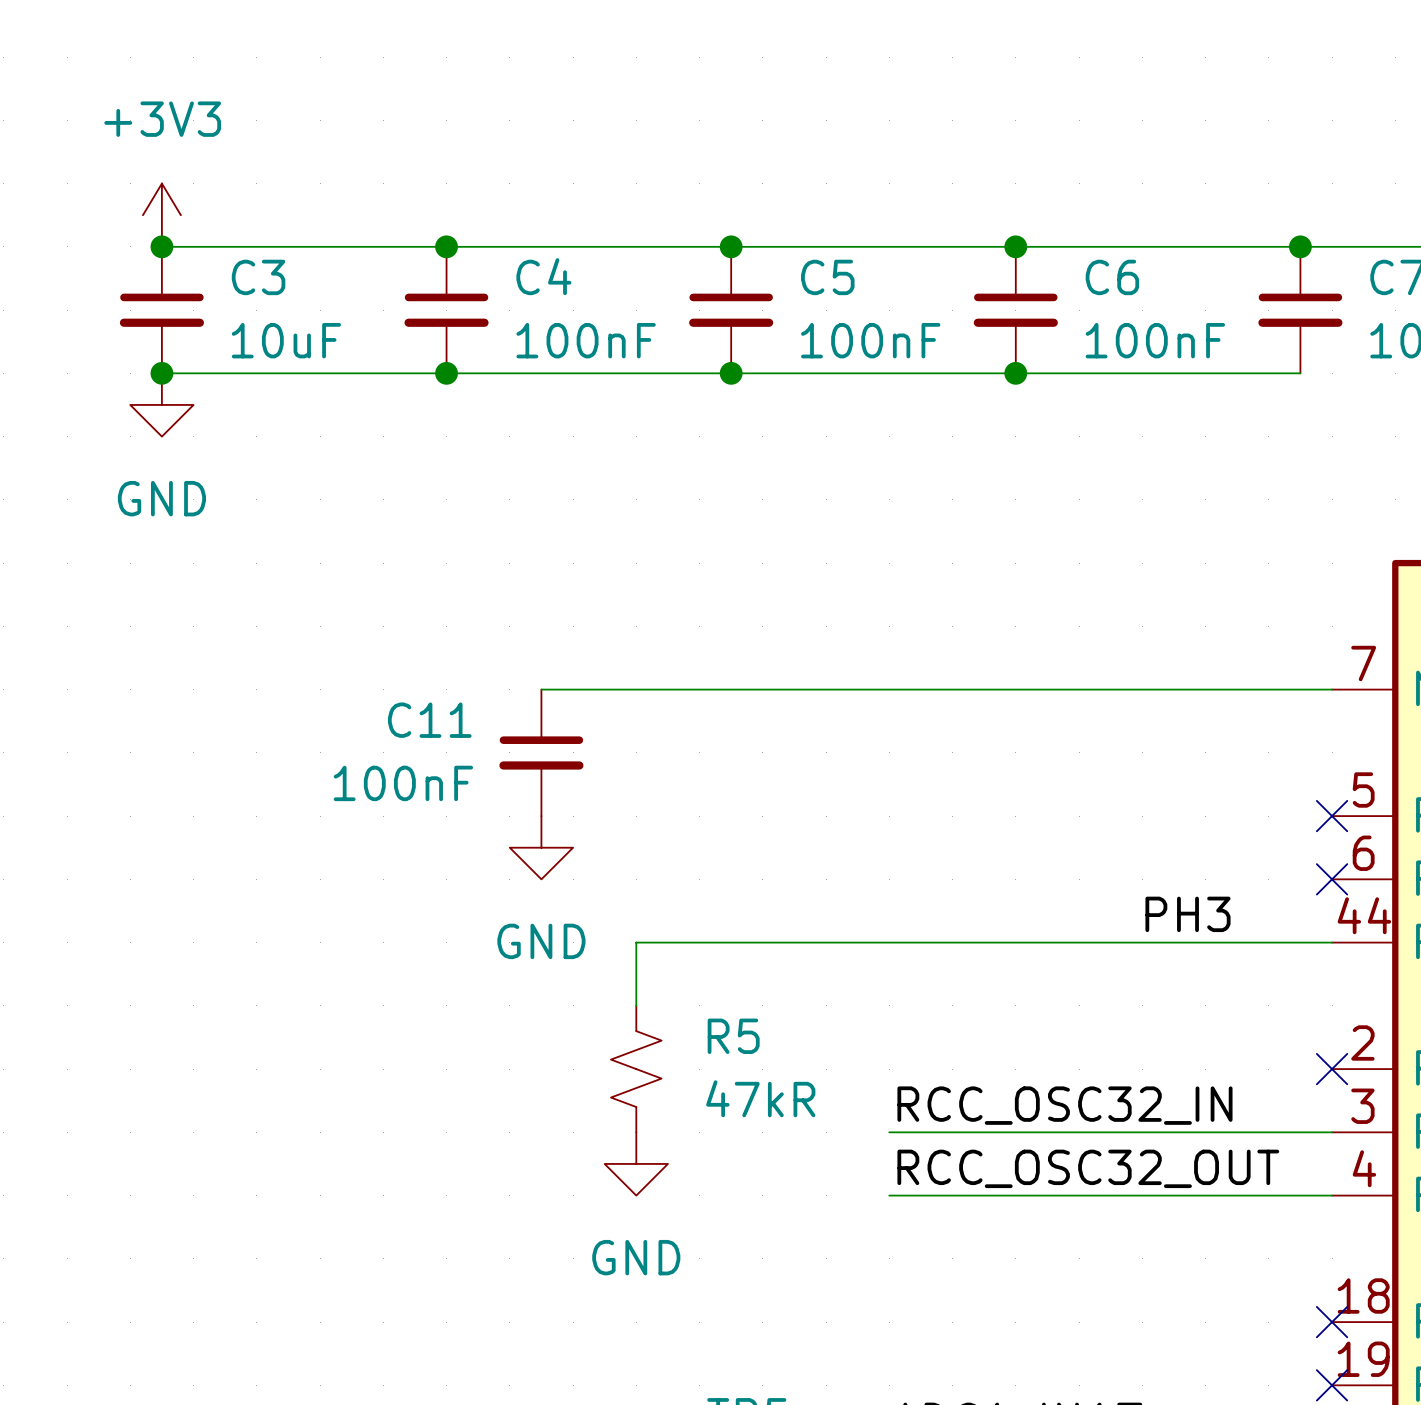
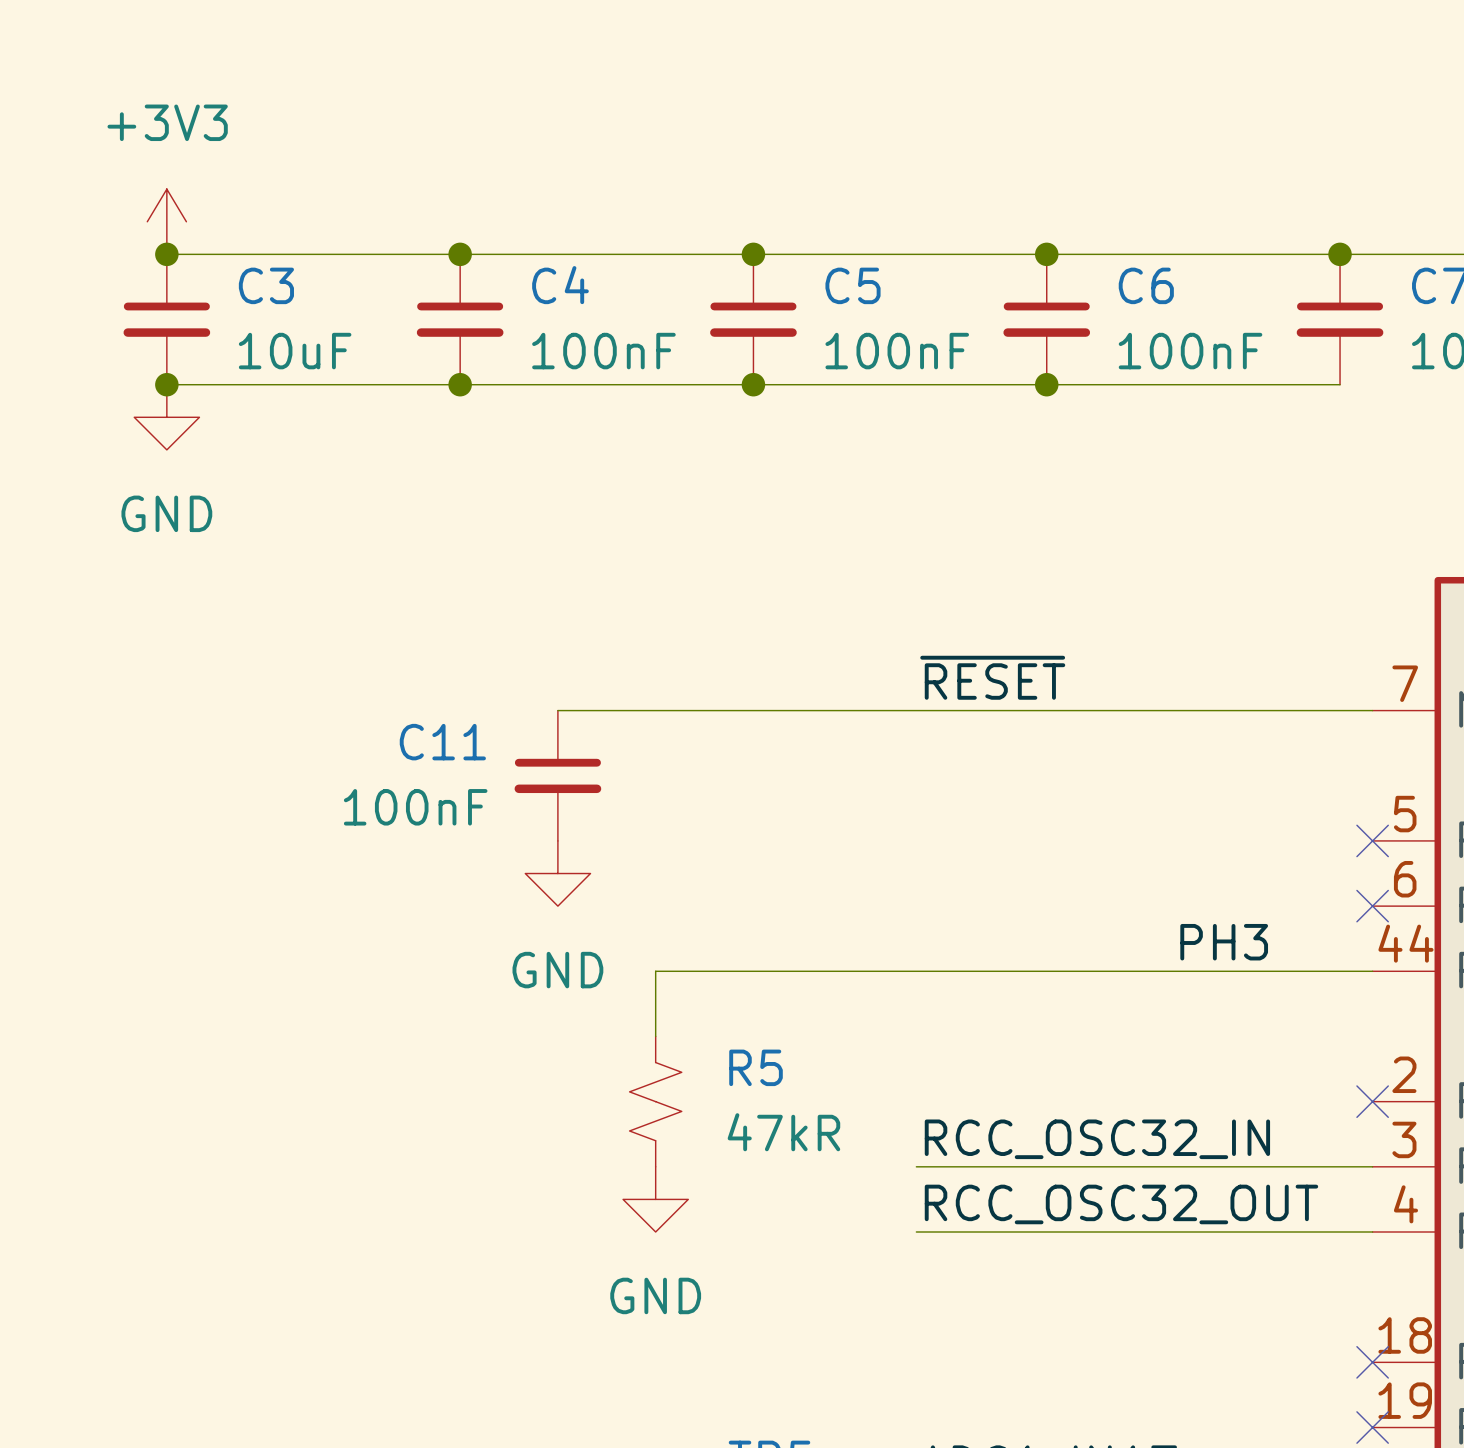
label: none -> ~{RESET} (992, 677)

